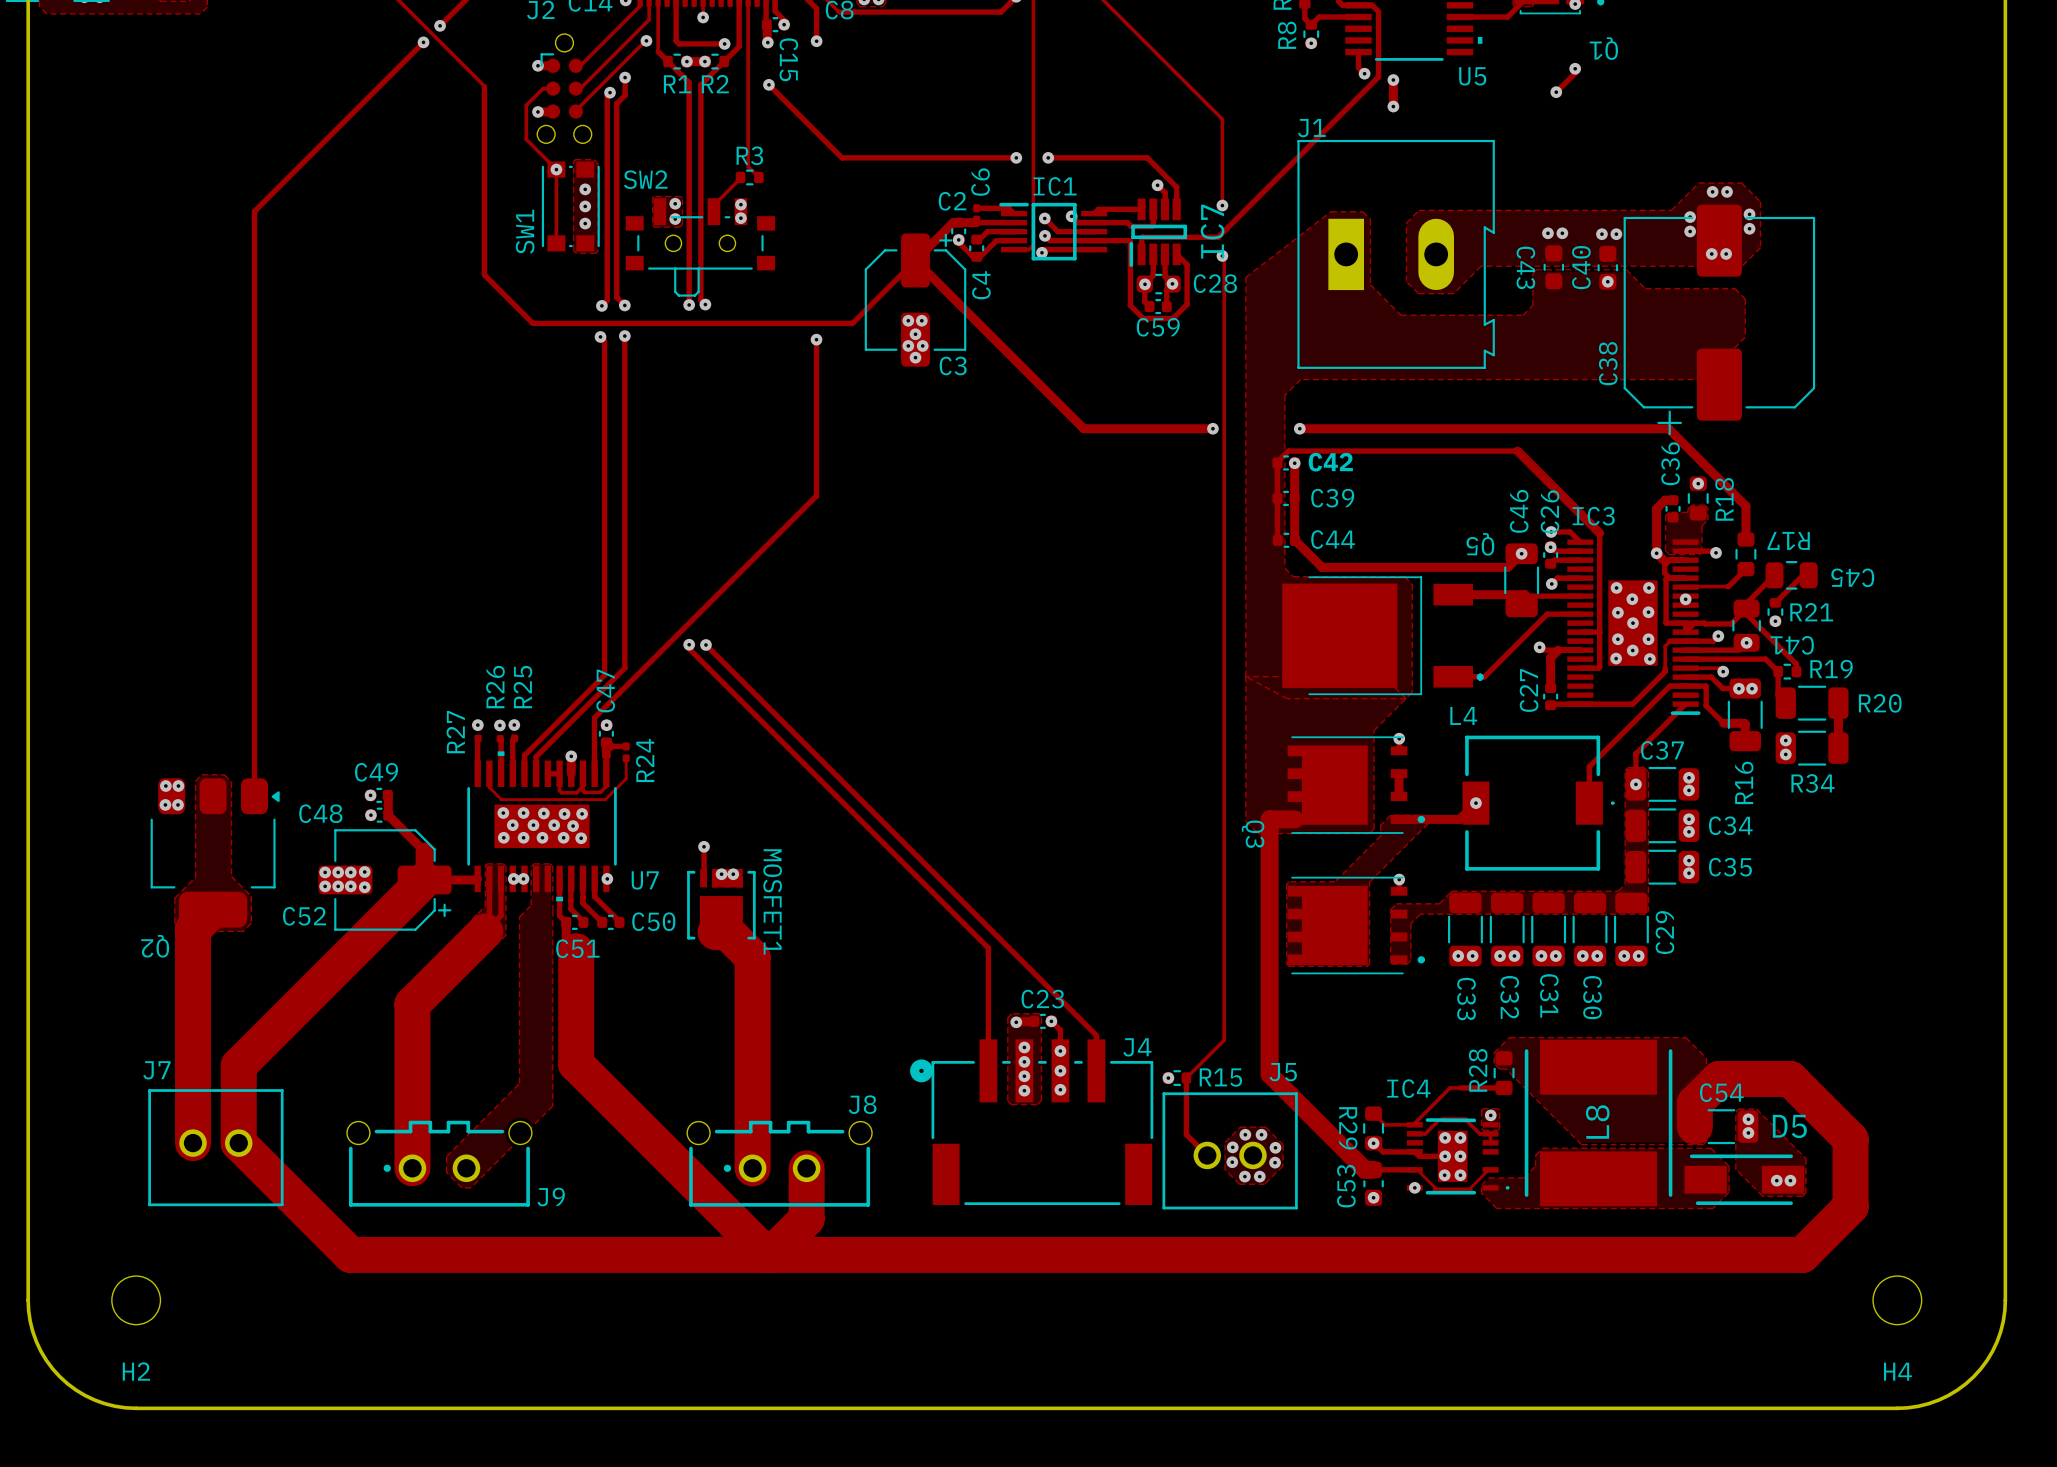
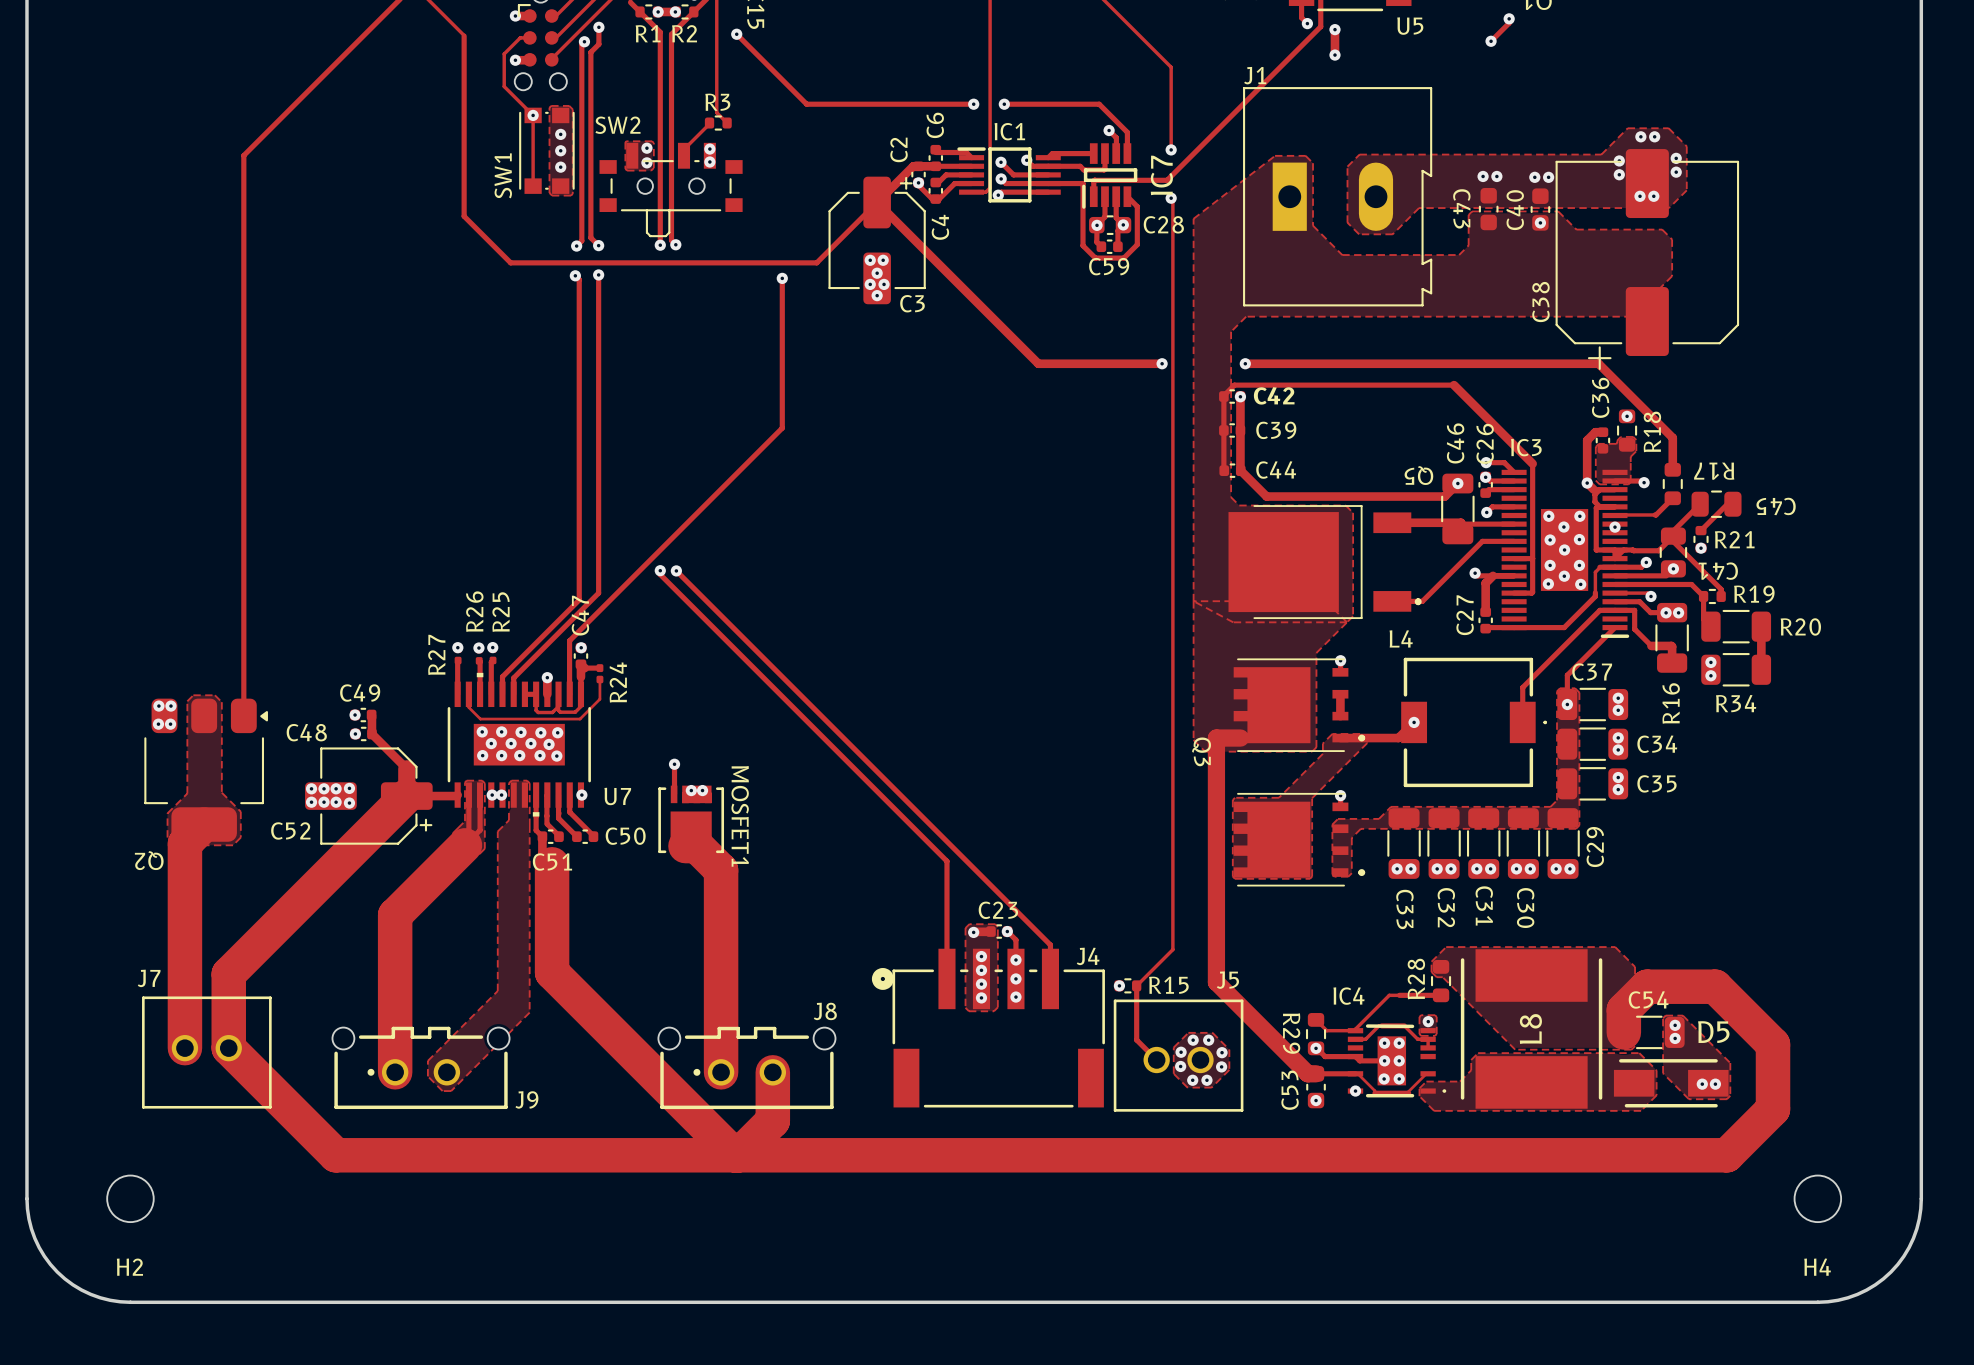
C2 name rotation: 0° (952, 201) -> 90° counterclockwise (899, 149)
C6 footprint: [973, 204, 981, 224] -> [928, 144, 944, 172]

